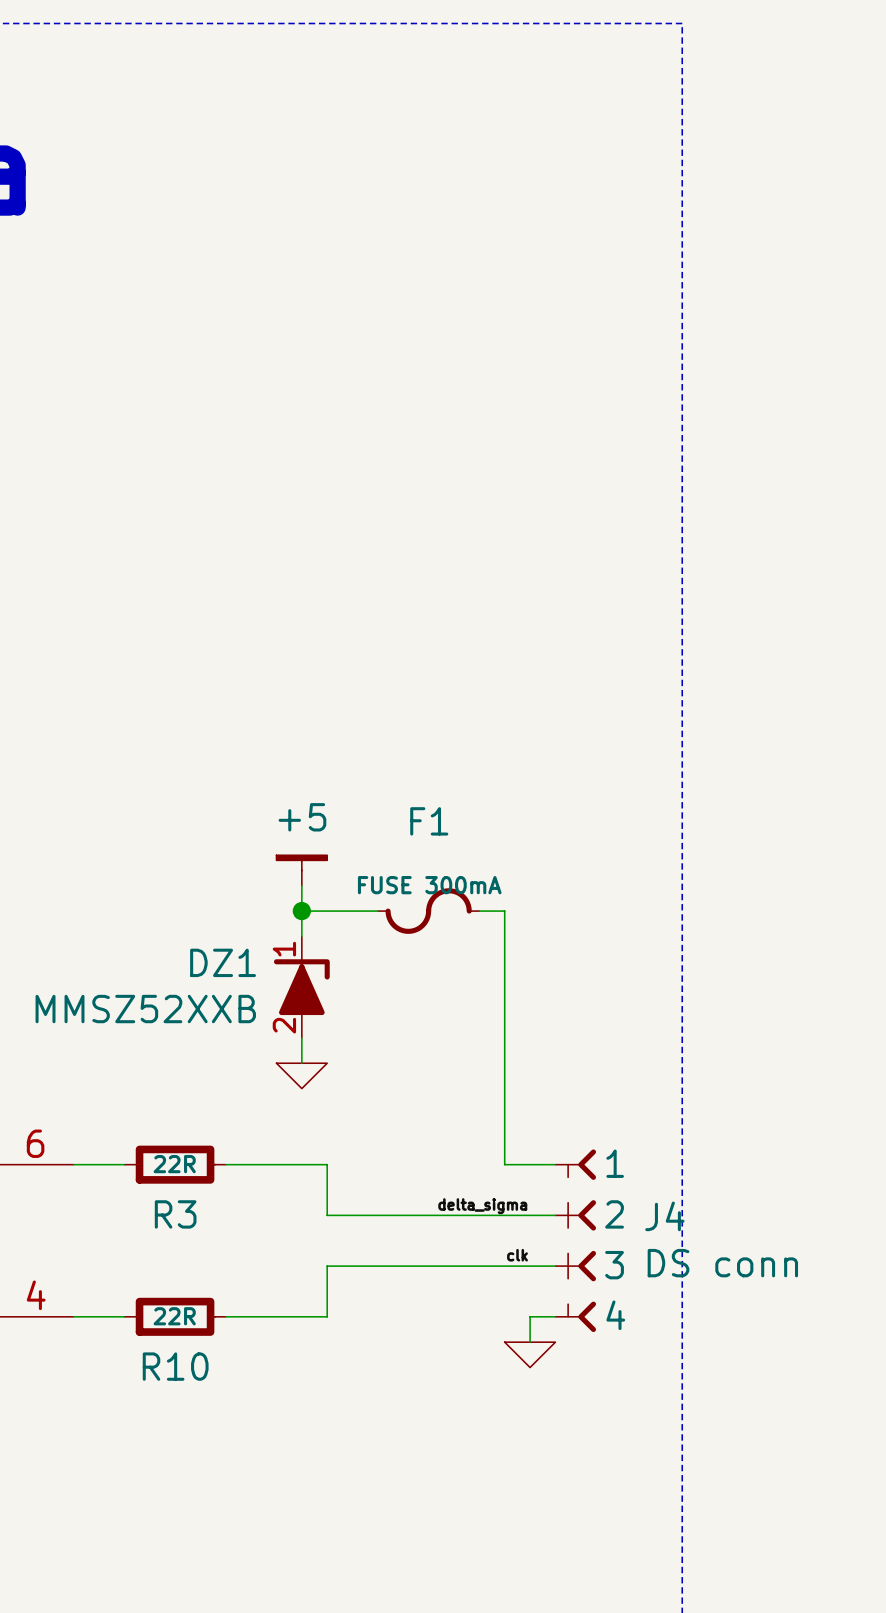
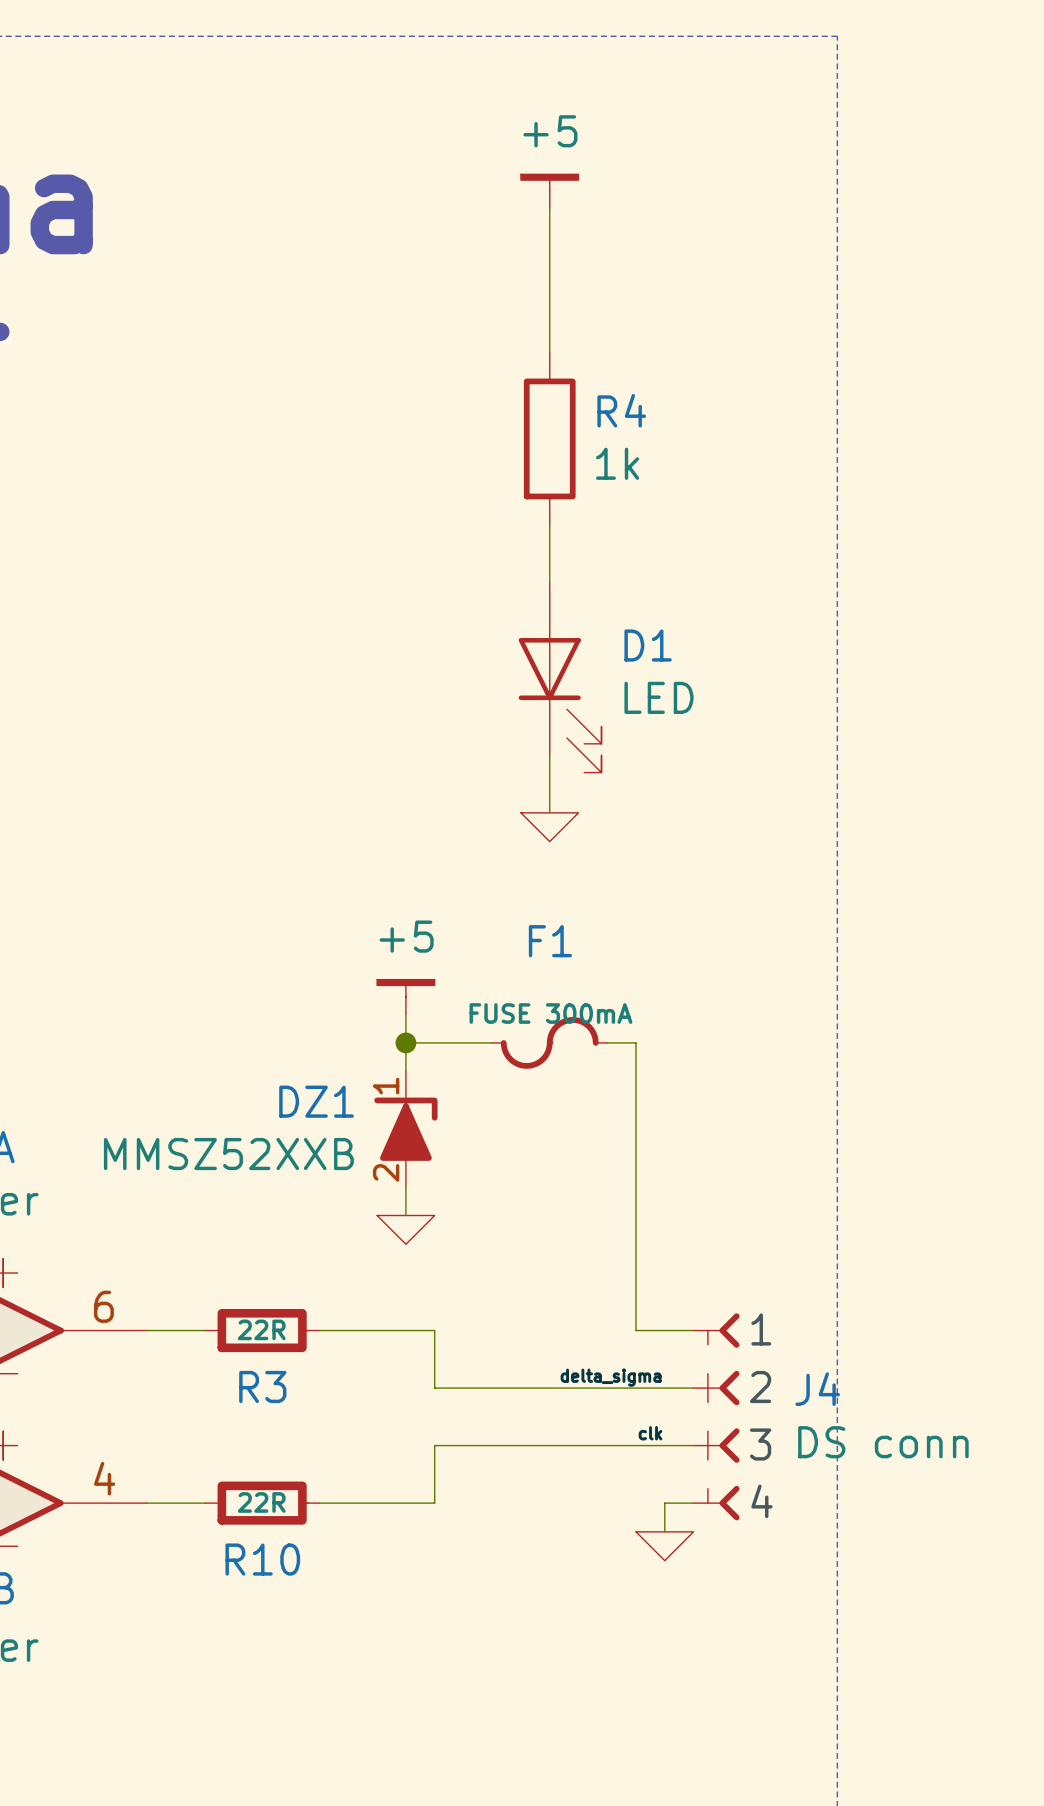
power symbol: none -> +5 (549, 191)
wire: none -> (549, 208) (549, 352)
R4: none -> 1k (549, 438)
wire: none -> (549, 525) (549, 582)
D1: none -> LED (560, 677)
wire: none -> (549, 755) (549, 812)
power symbol: none -> (549, 827)

